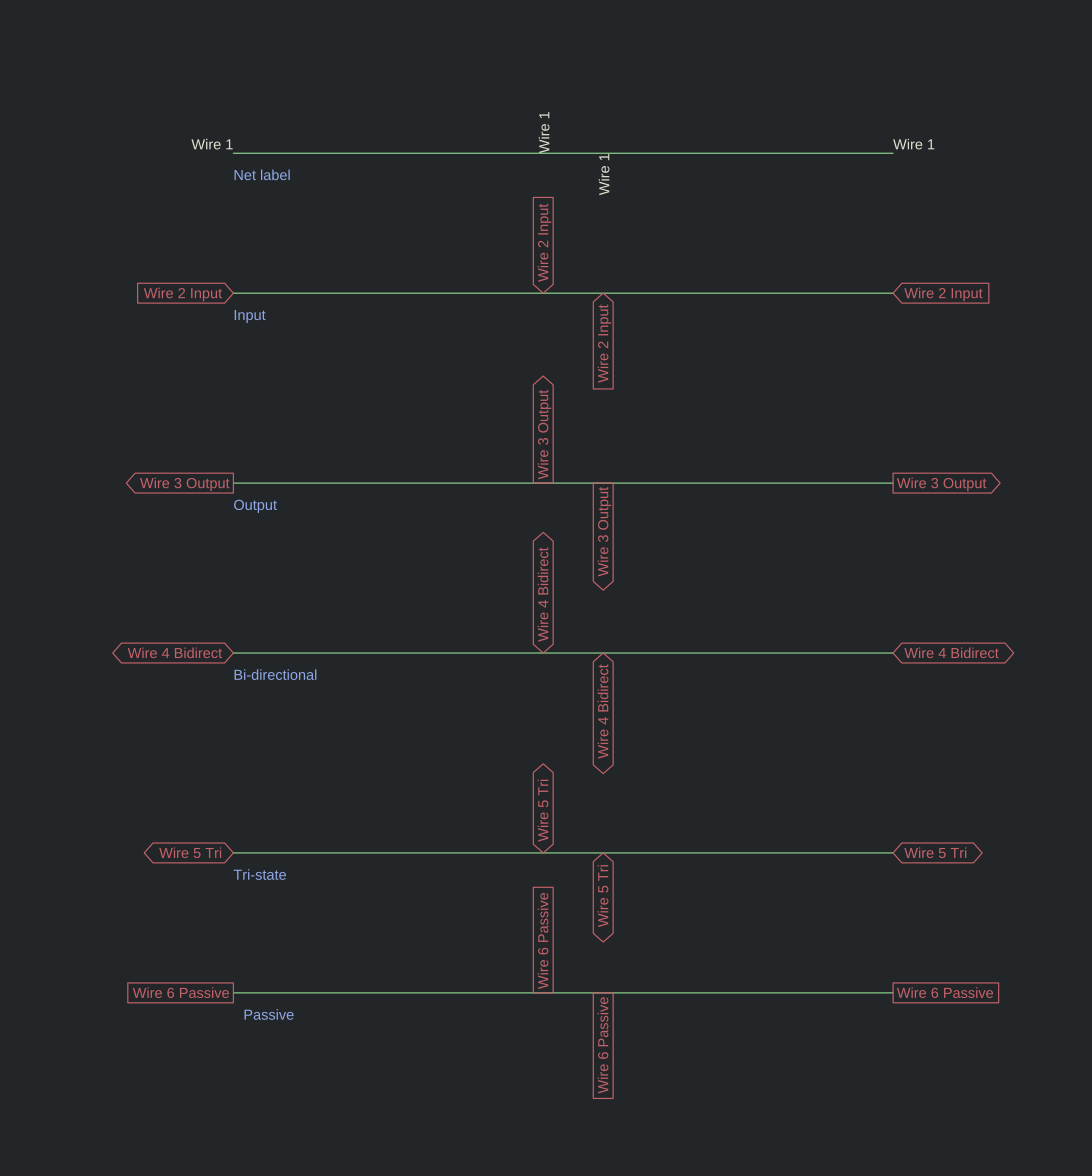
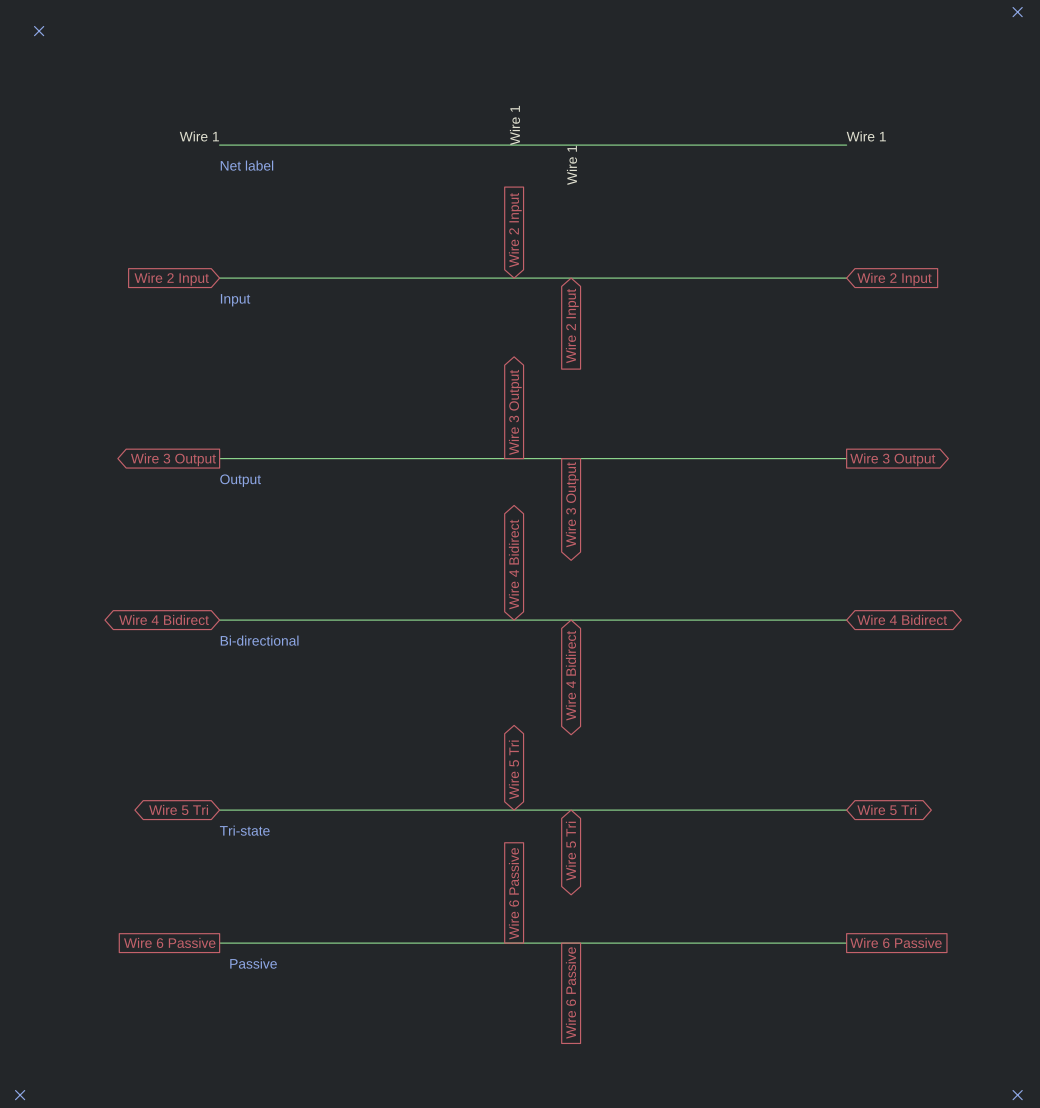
no-connect mark: none -> (1017, 12)
no-connect mark: none -> (39, 31)
no-connect mark: none -> (20, 1095)
no-connect mark: none -> (1017, 1095)

